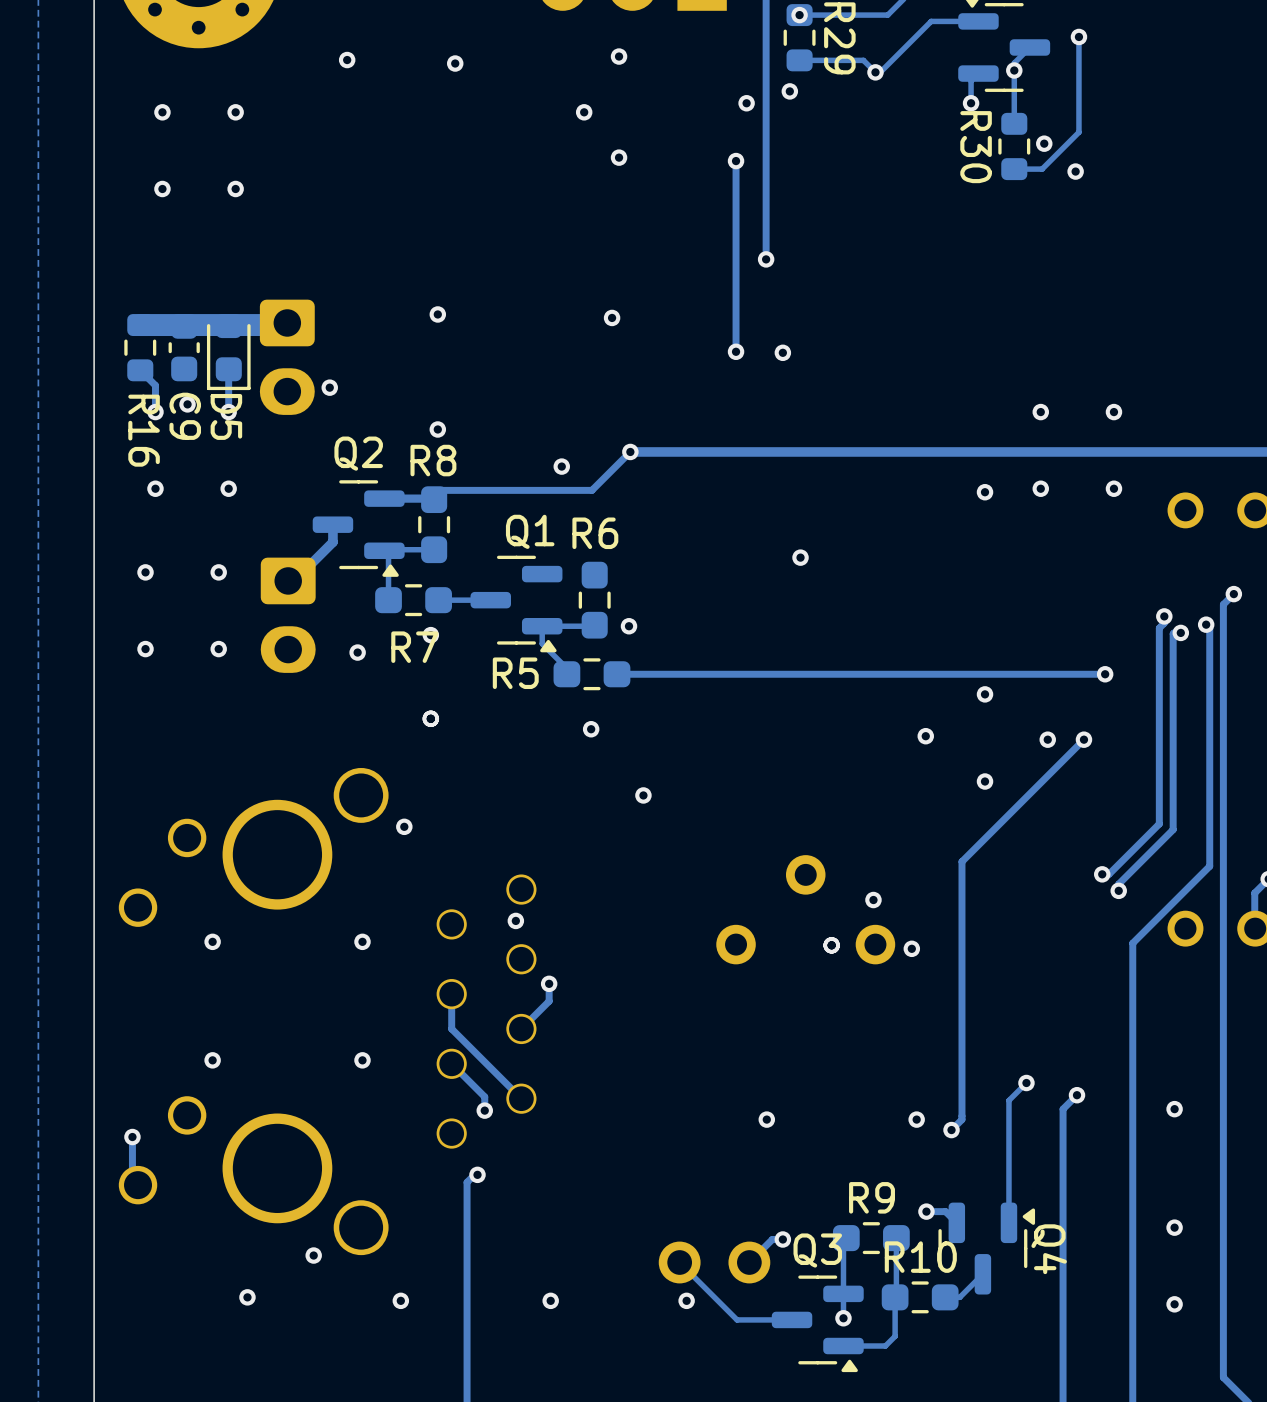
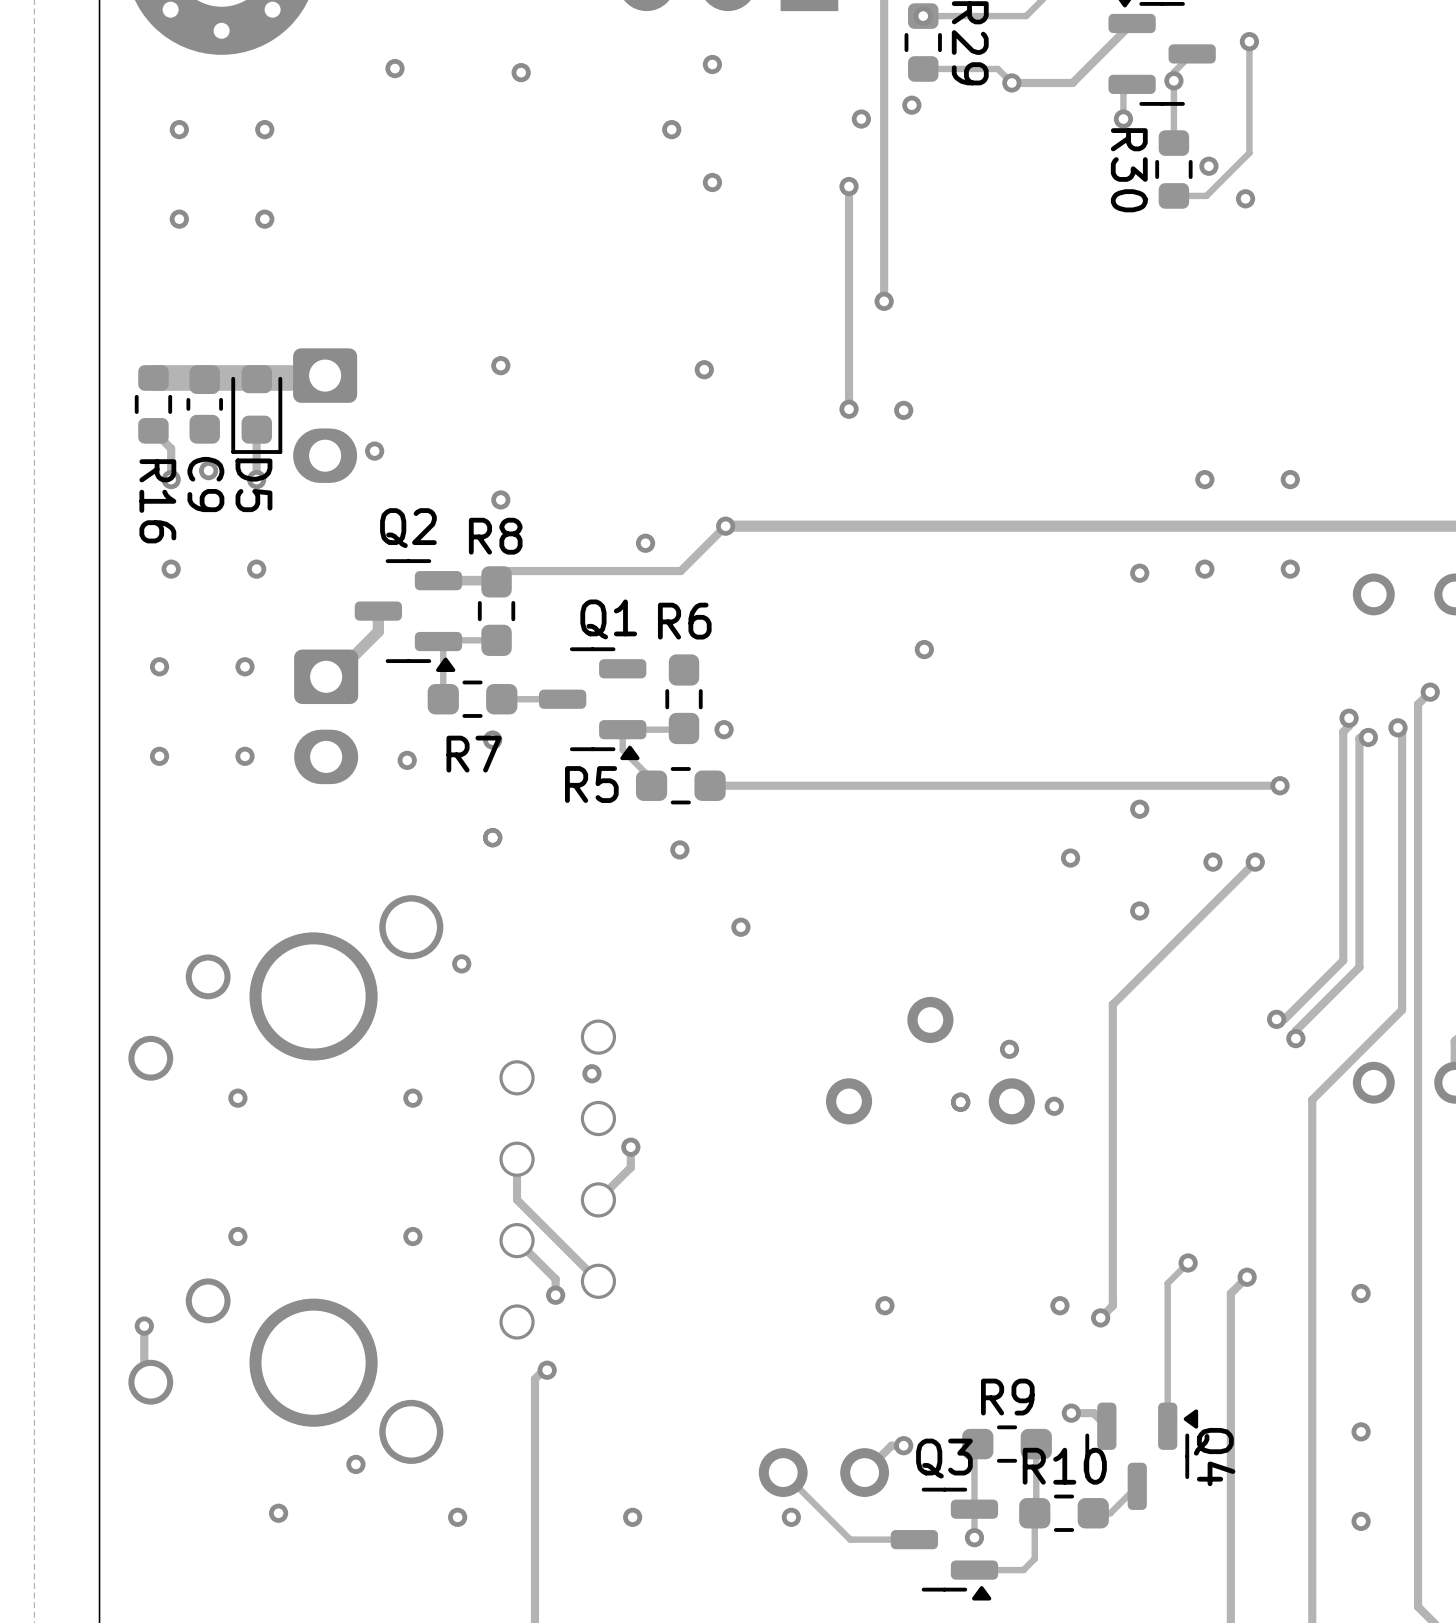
track: (978, 21) (931, 21) (880, 72) -> (1132, 23) (1072, 82) (1011, 82)

